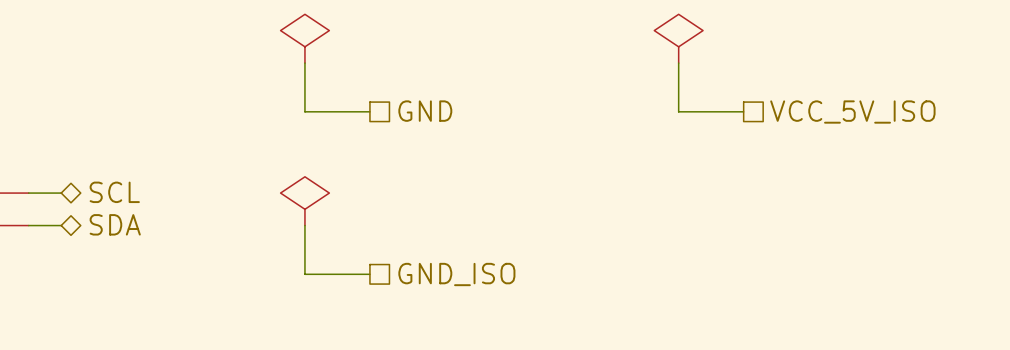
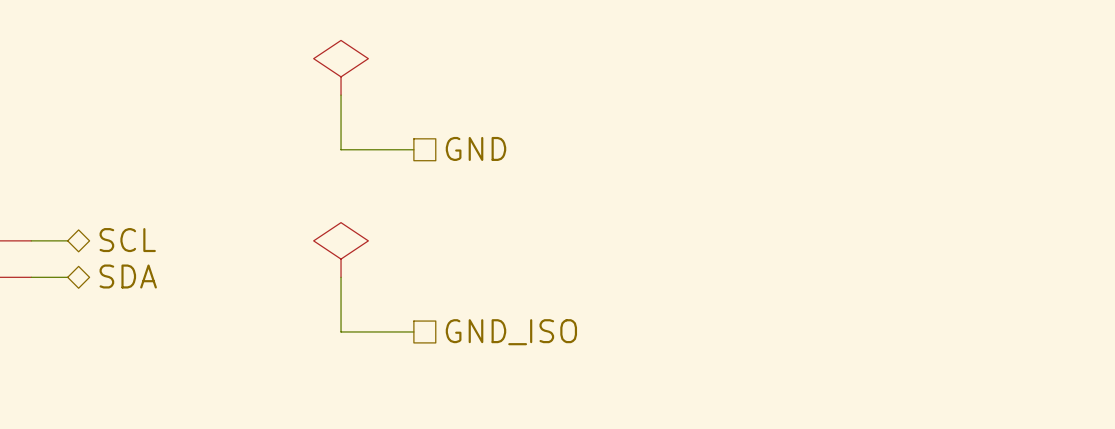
power symbol: (678, 38) -> none
wire: (678, 63) (678, 111) (743, 111) -> none
hierarchical label: VCC_5V_ISO (852, 112) -> none

